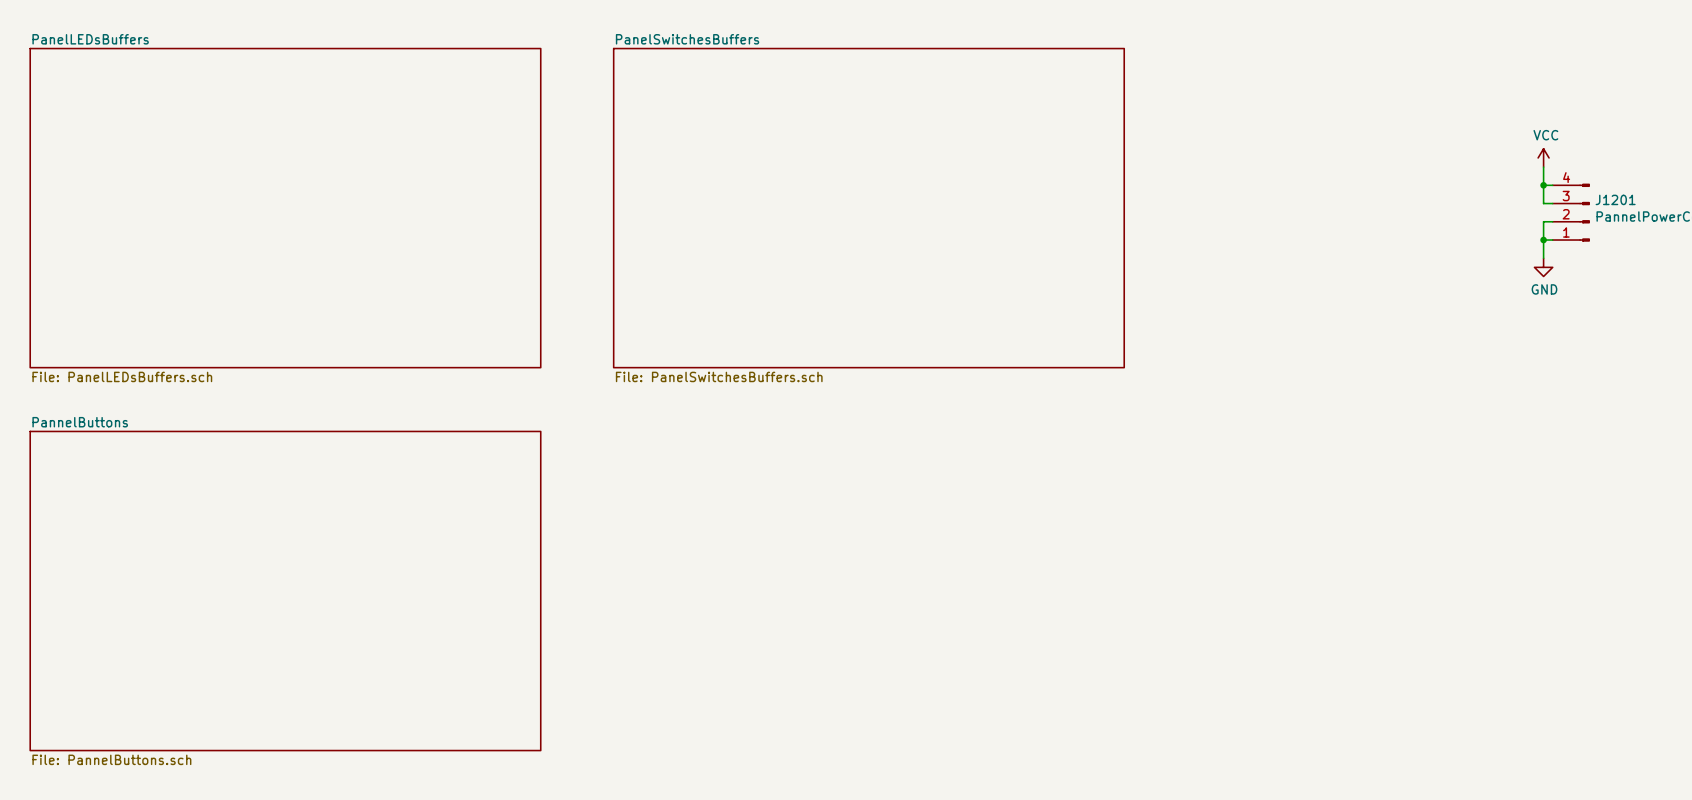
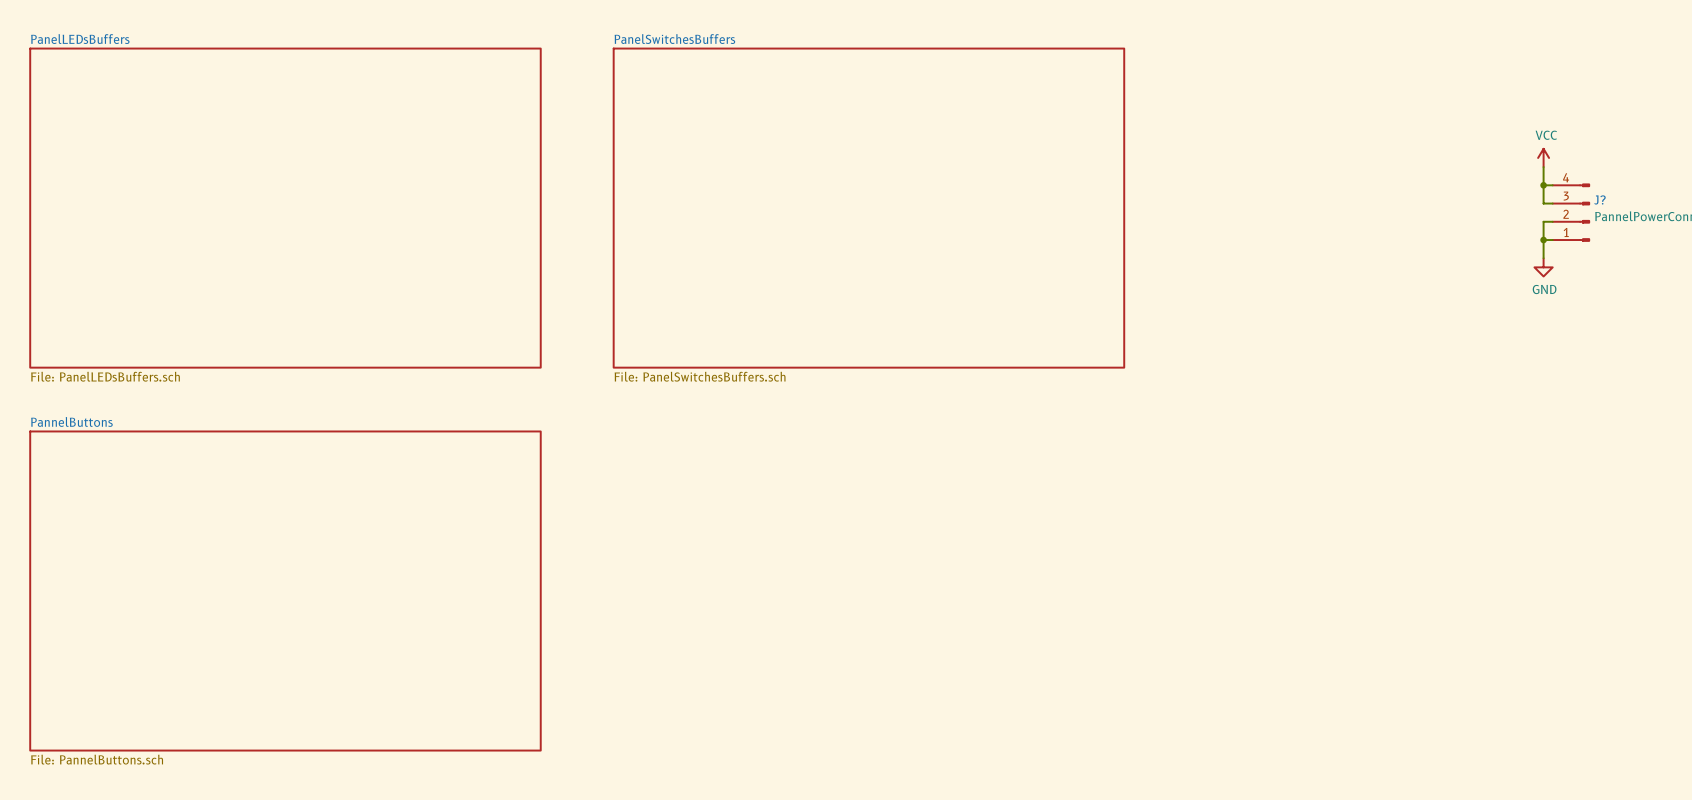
J1201 name: J1201 (1615, 199) -> J? (1599, 199)

